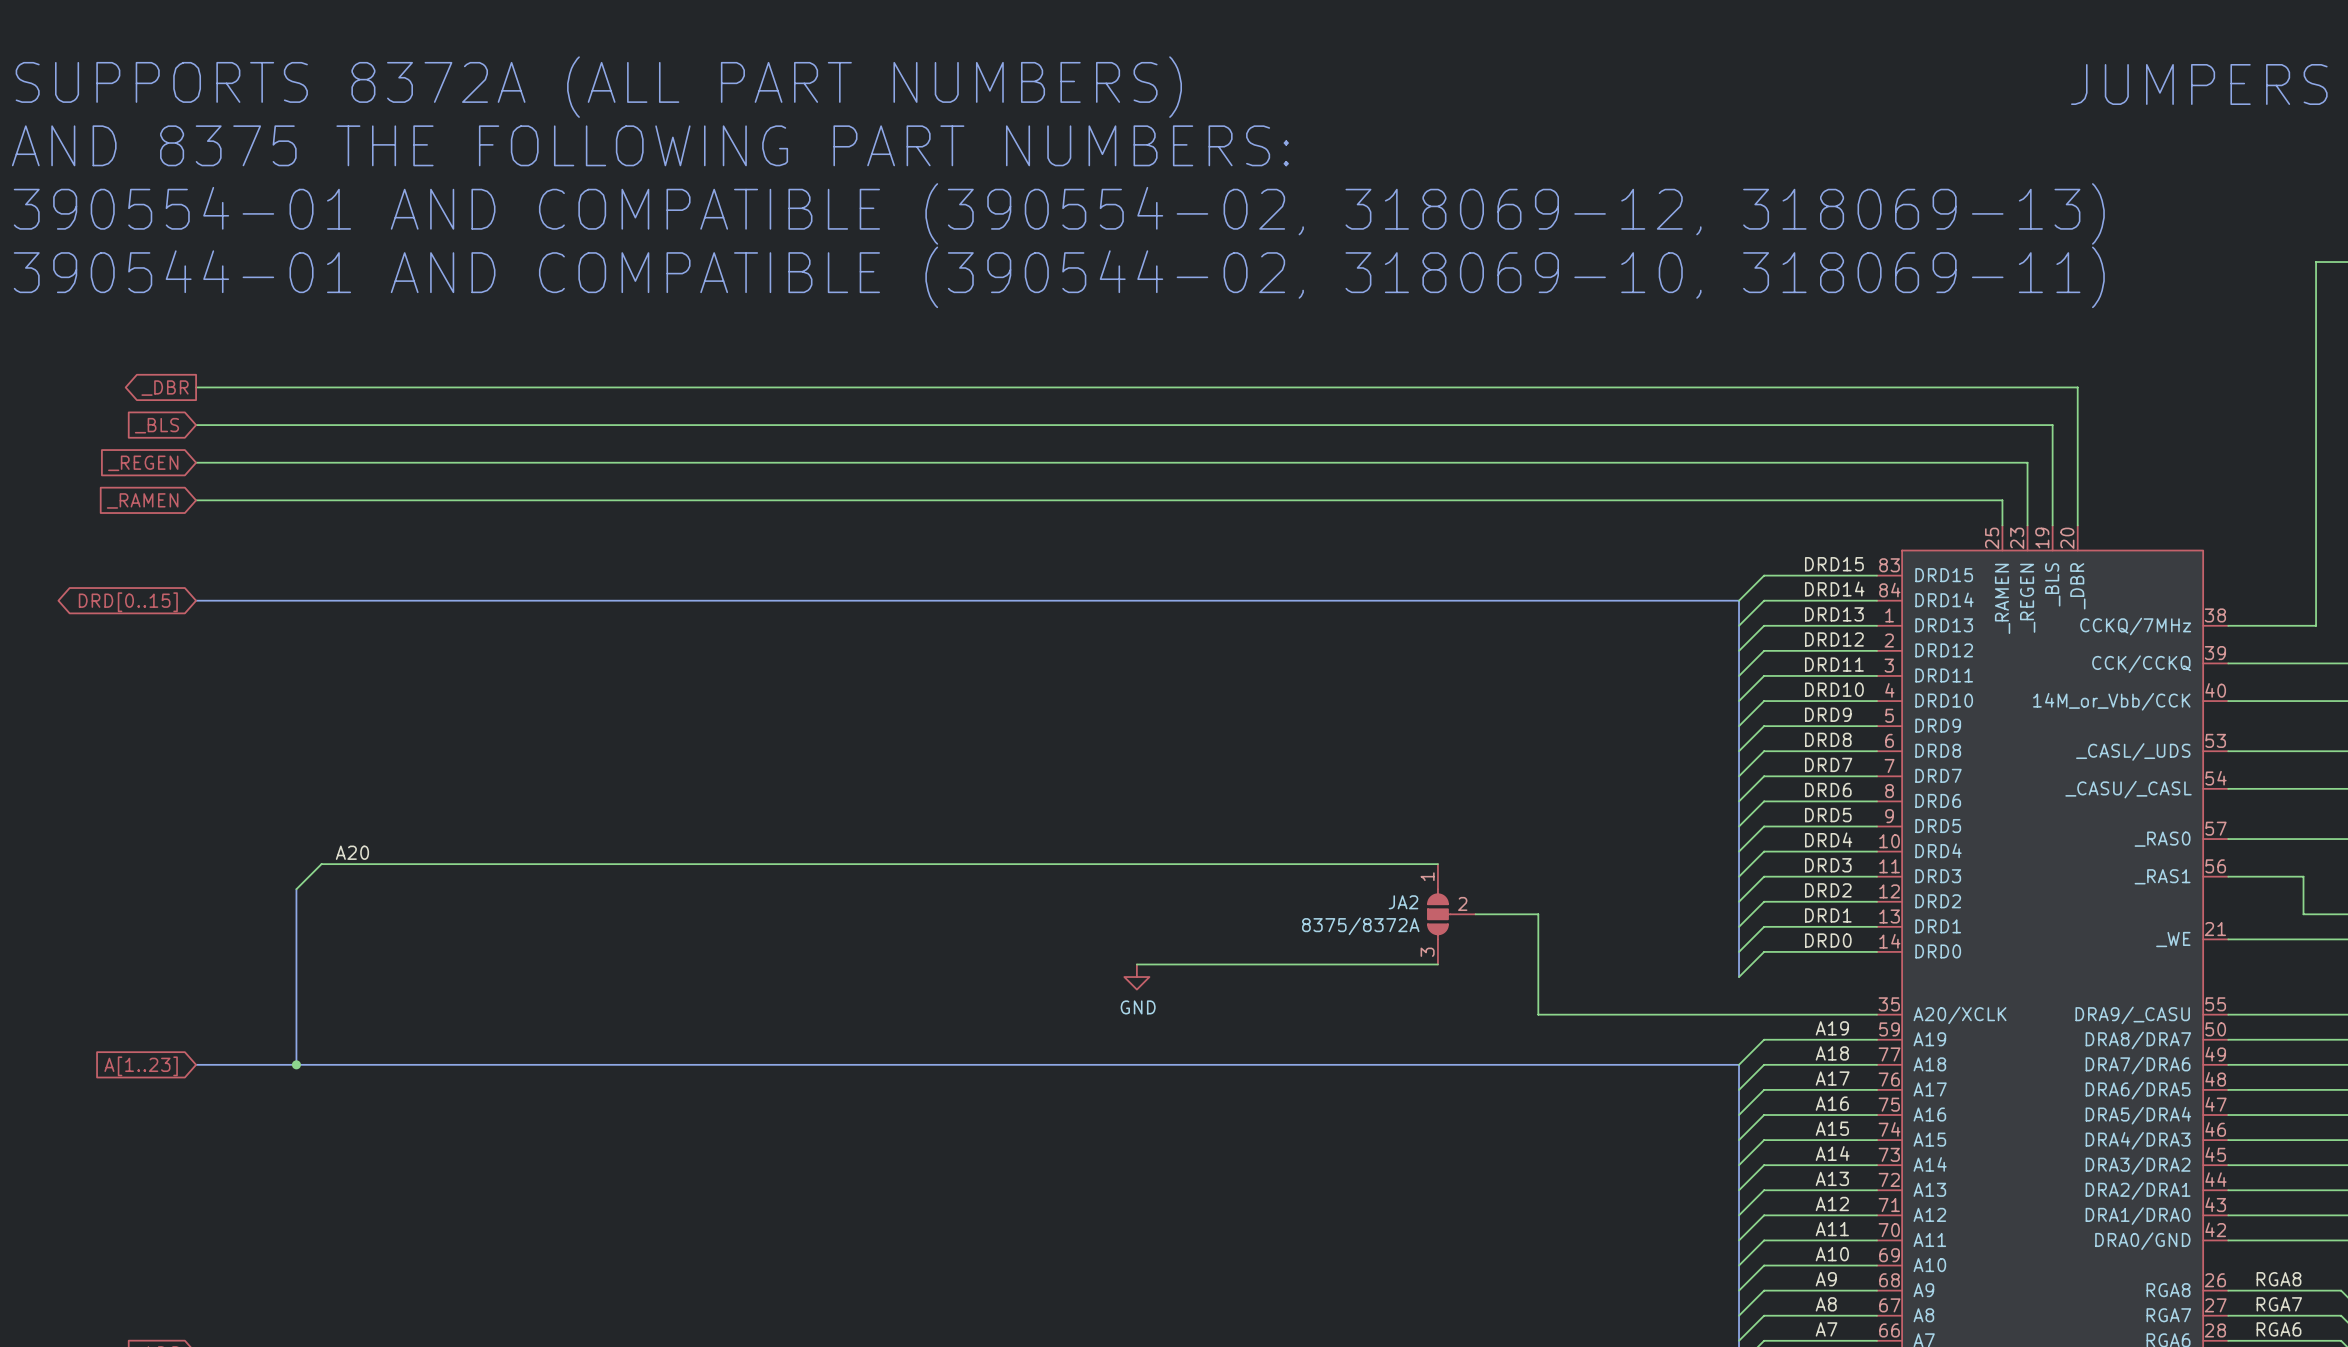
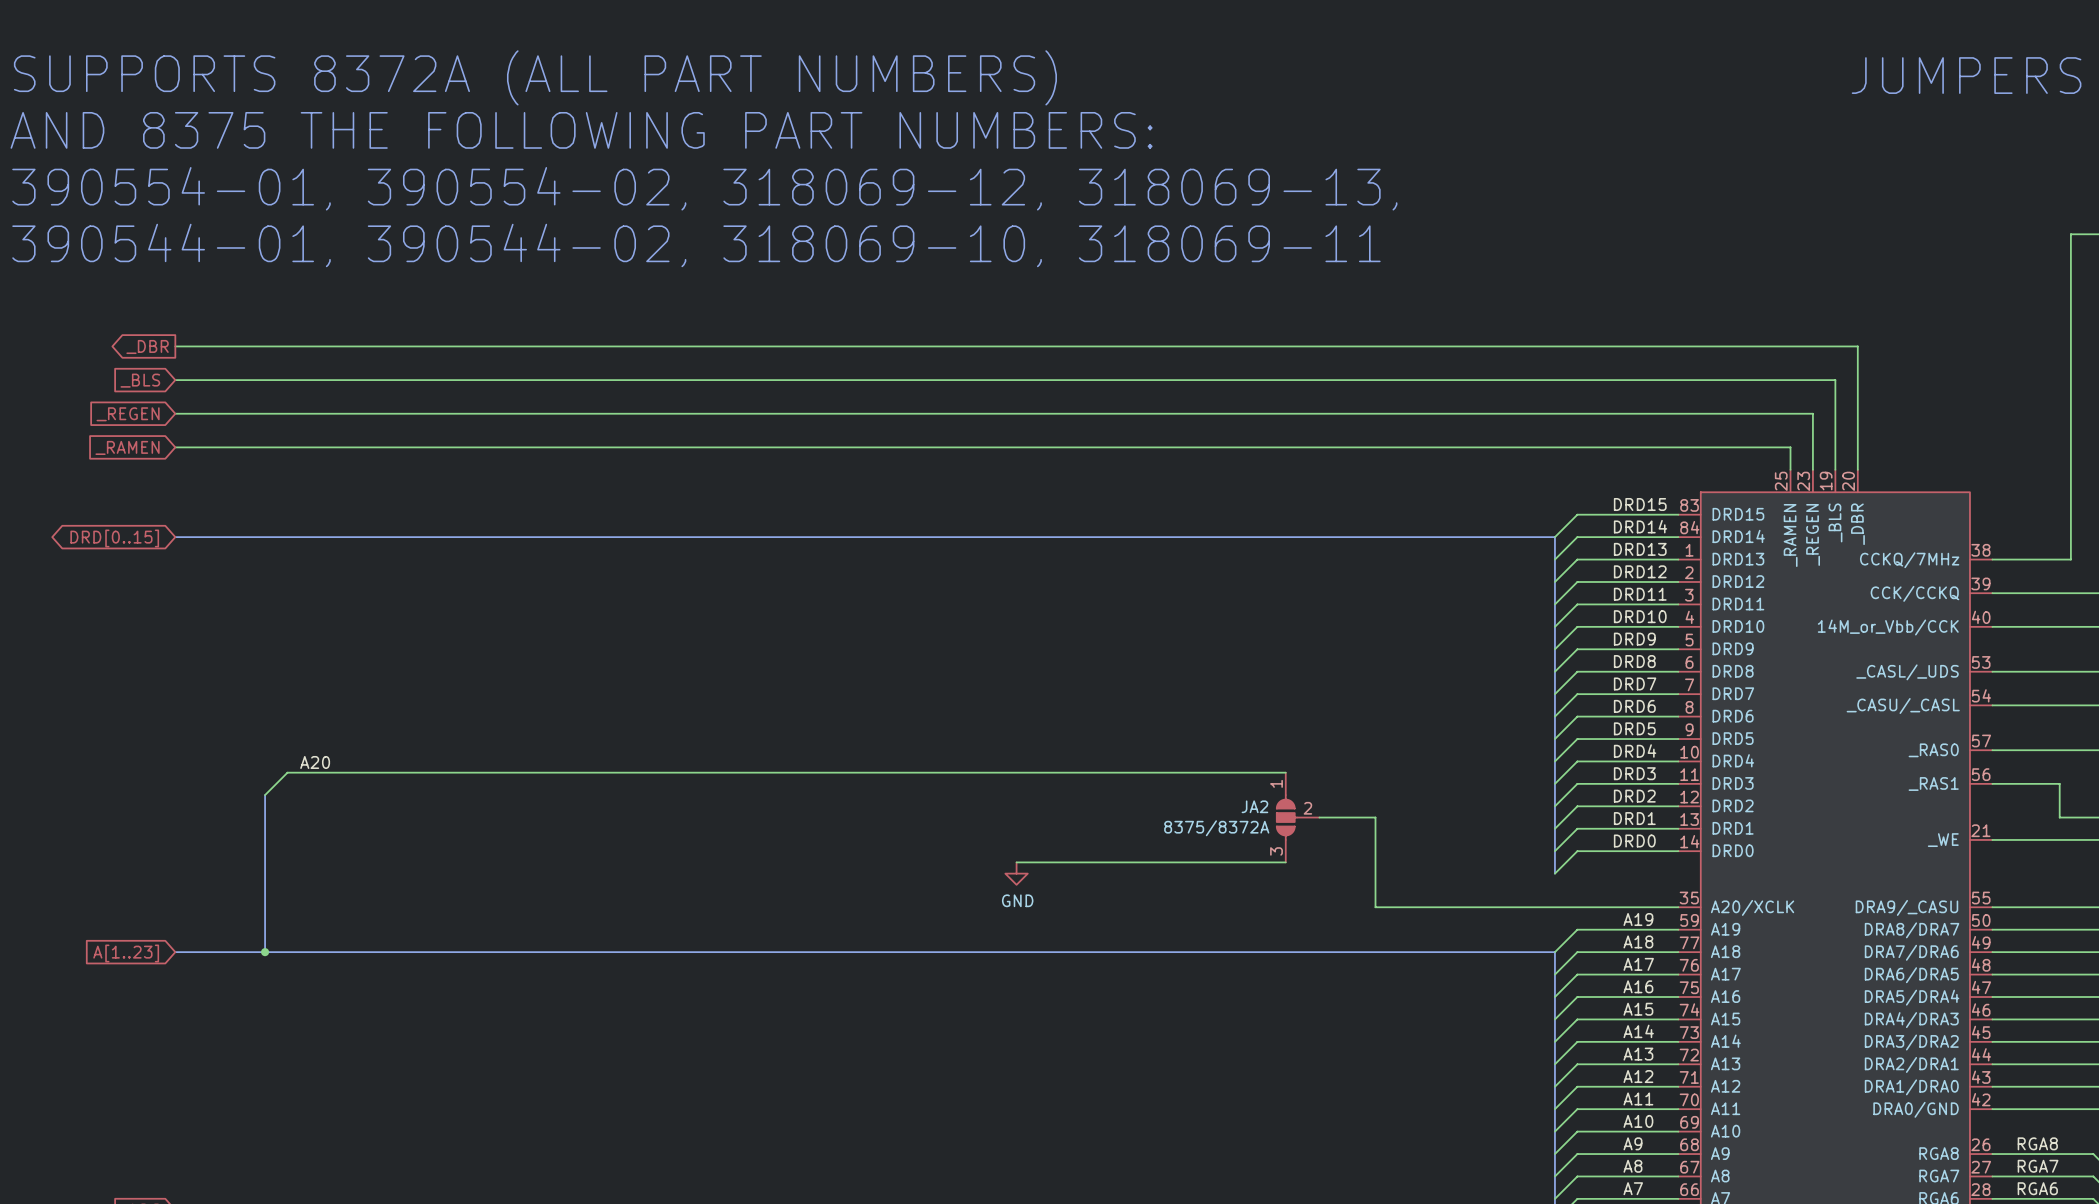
text: 390554-01 AND COMPATIBLE (390554-02, 318069-12, 318069-13) (1059, 213) -> 390554-01, 390554-02, 318069-12, 318069-13, (704, 188)
text: 390544-01 AND COMPATIBLE (390544-02, 318069-10, 318069-11) (1059, 277) -> 390544-01, 390544-02, 318069-10, 318069-11 (696, 245)

